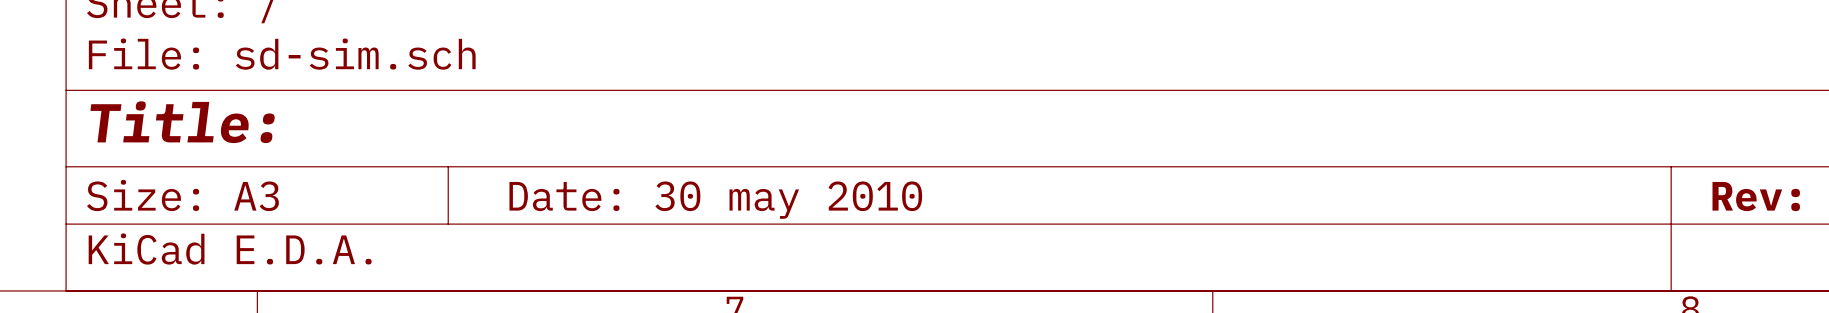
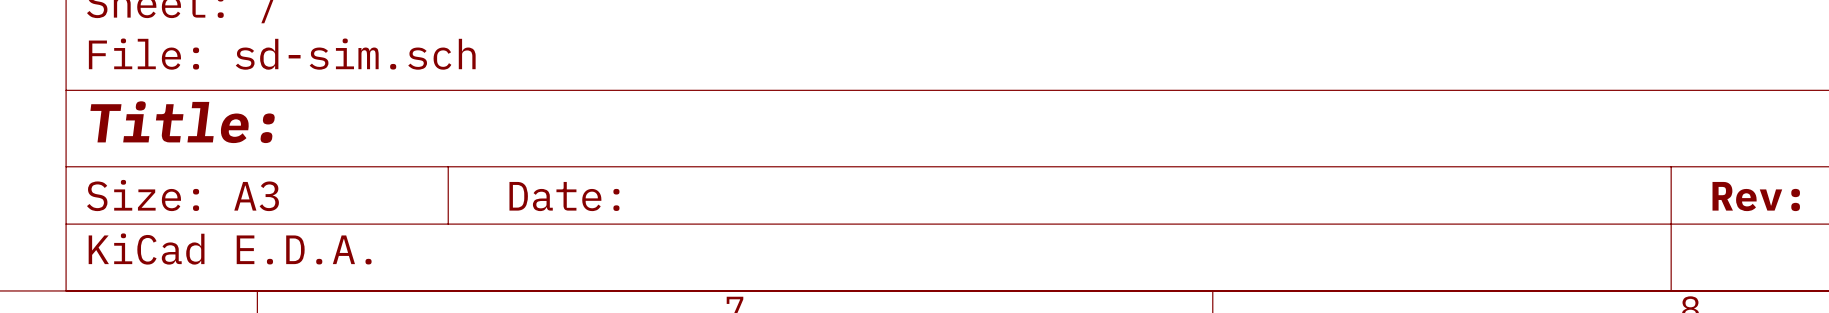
title block: Date: 30 may 2010 (715, 200) -> Date: (564, 196)

